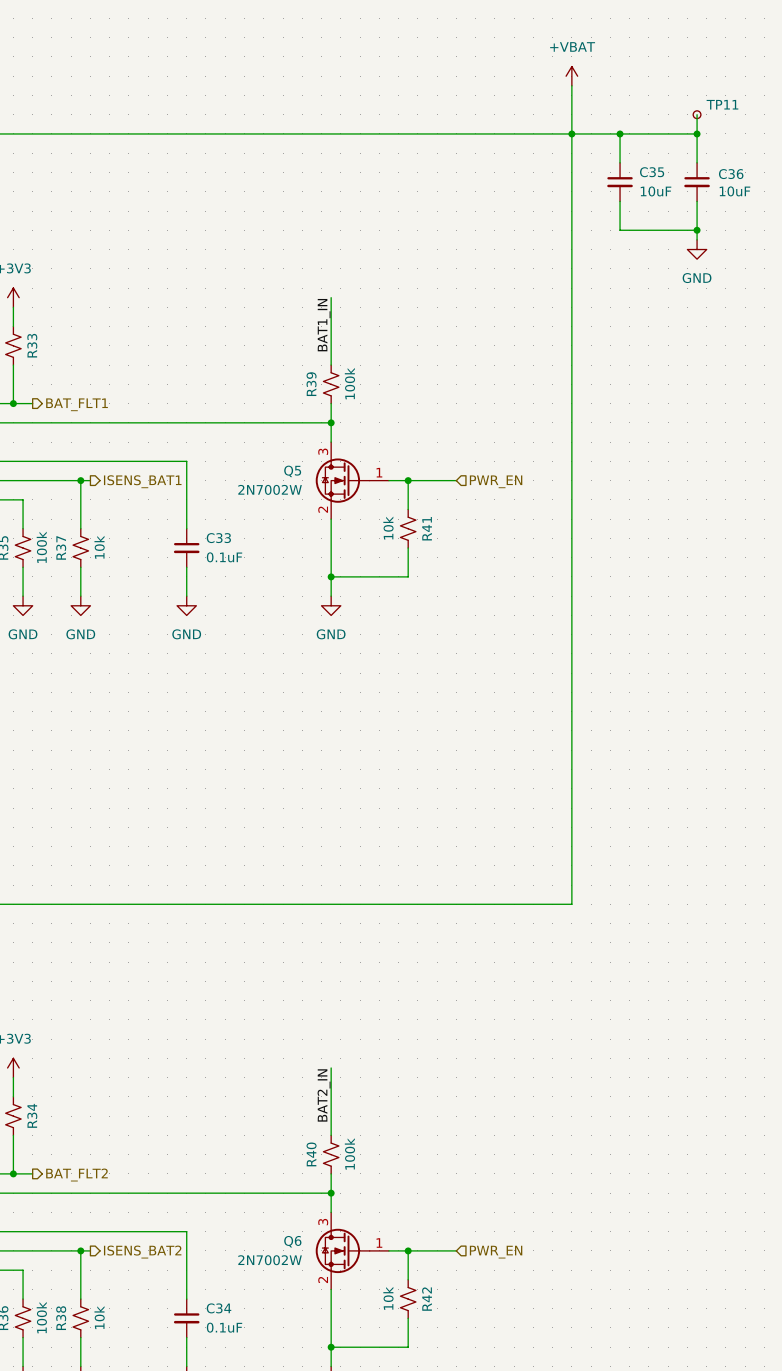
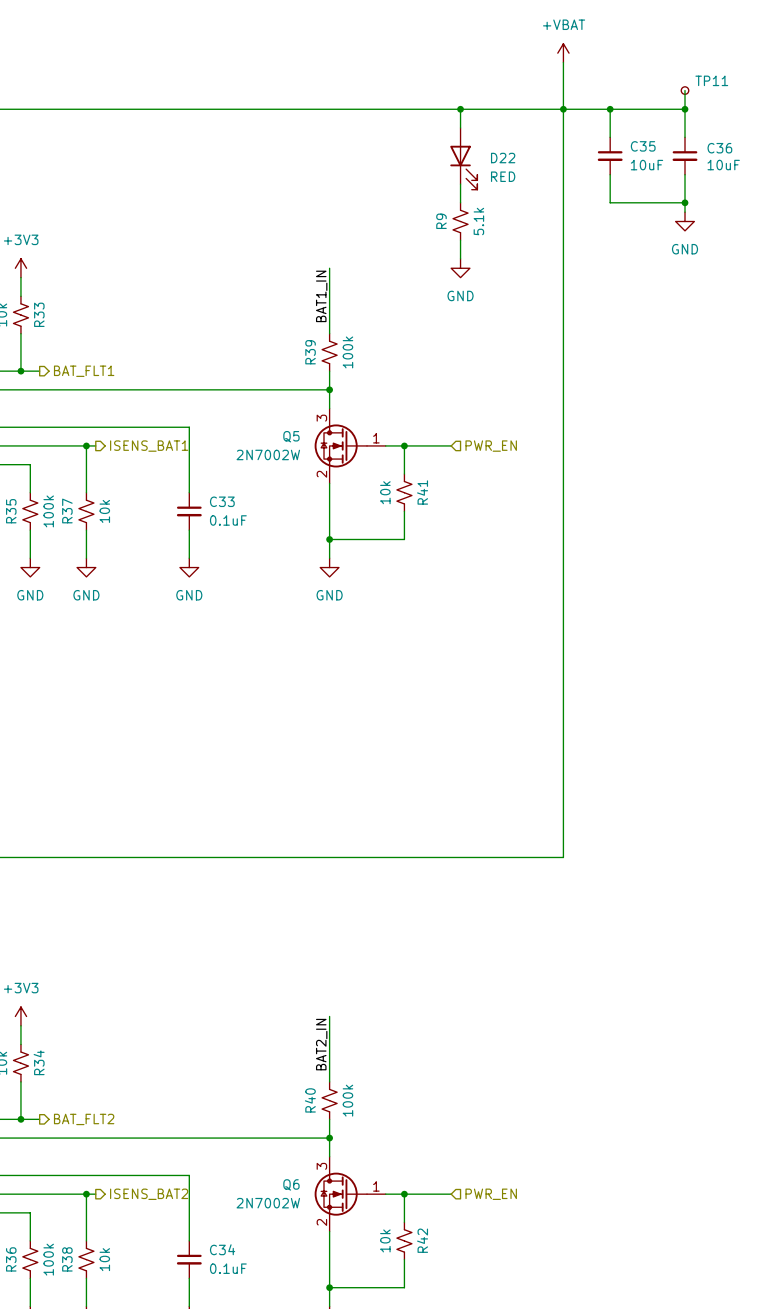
wire: none -> (460, 109) (460, 127)
junction: none -> (460, 109)
D22: none -> RED (463, 158)
wire: none -> (460, 184) (460, 202)
R9: none -> 5.1k (460, 221)
wire: none -> (460, 240) (460, 258)
power symbol: none -> GND (460, 268)

